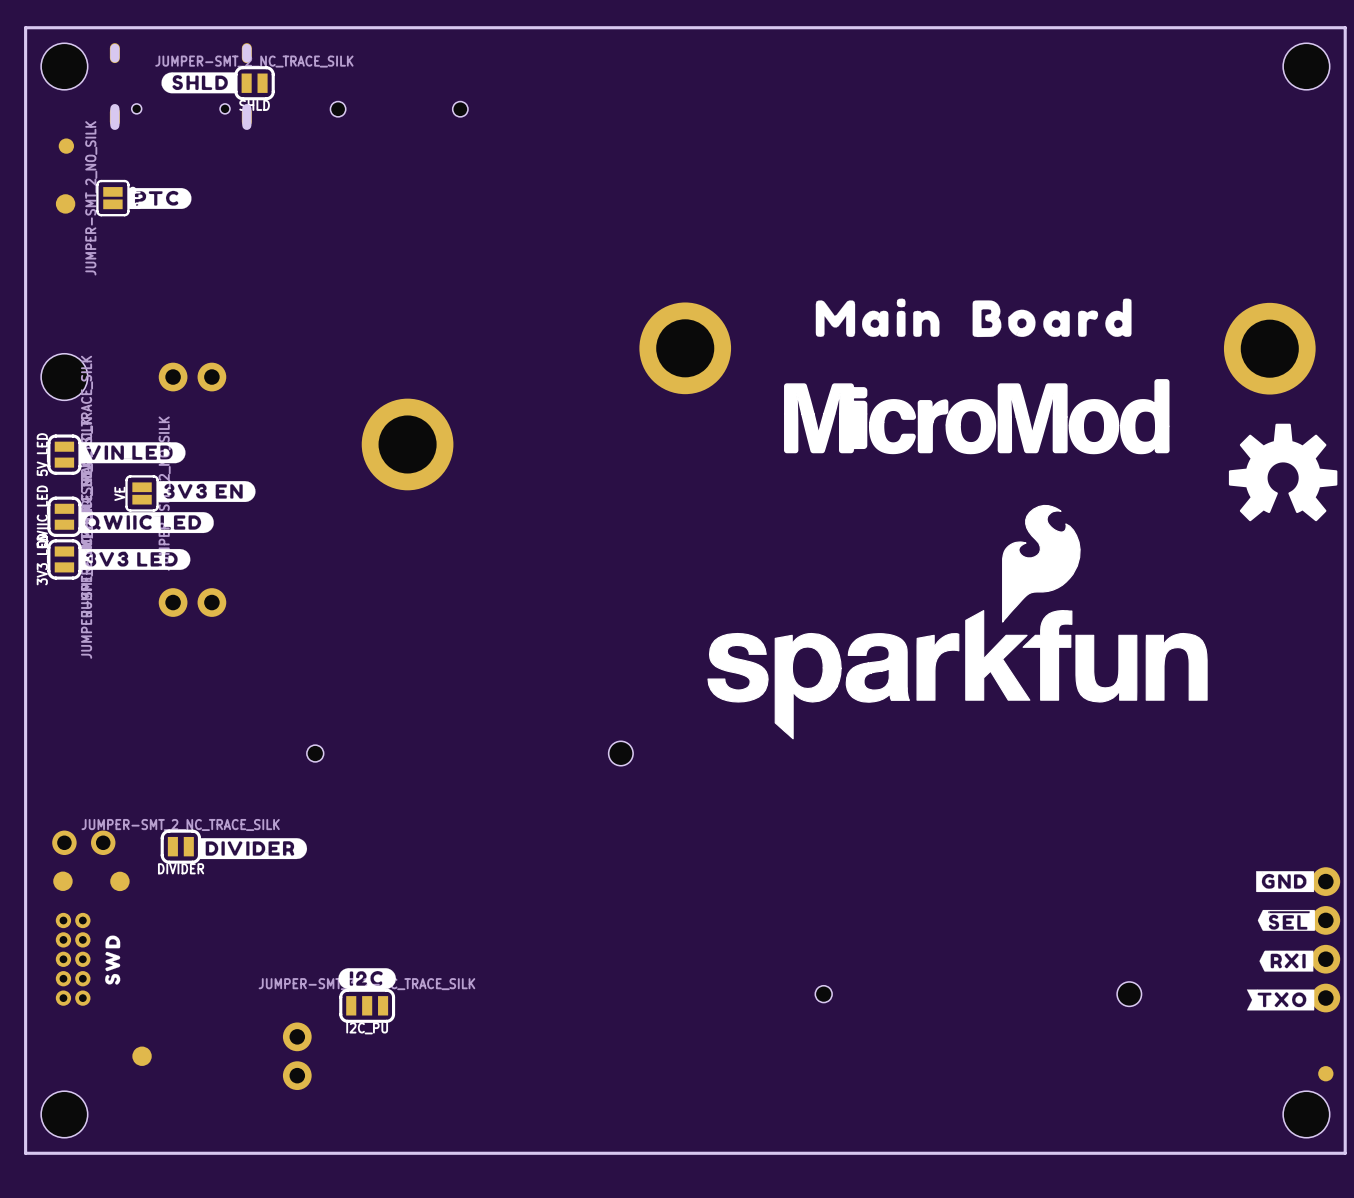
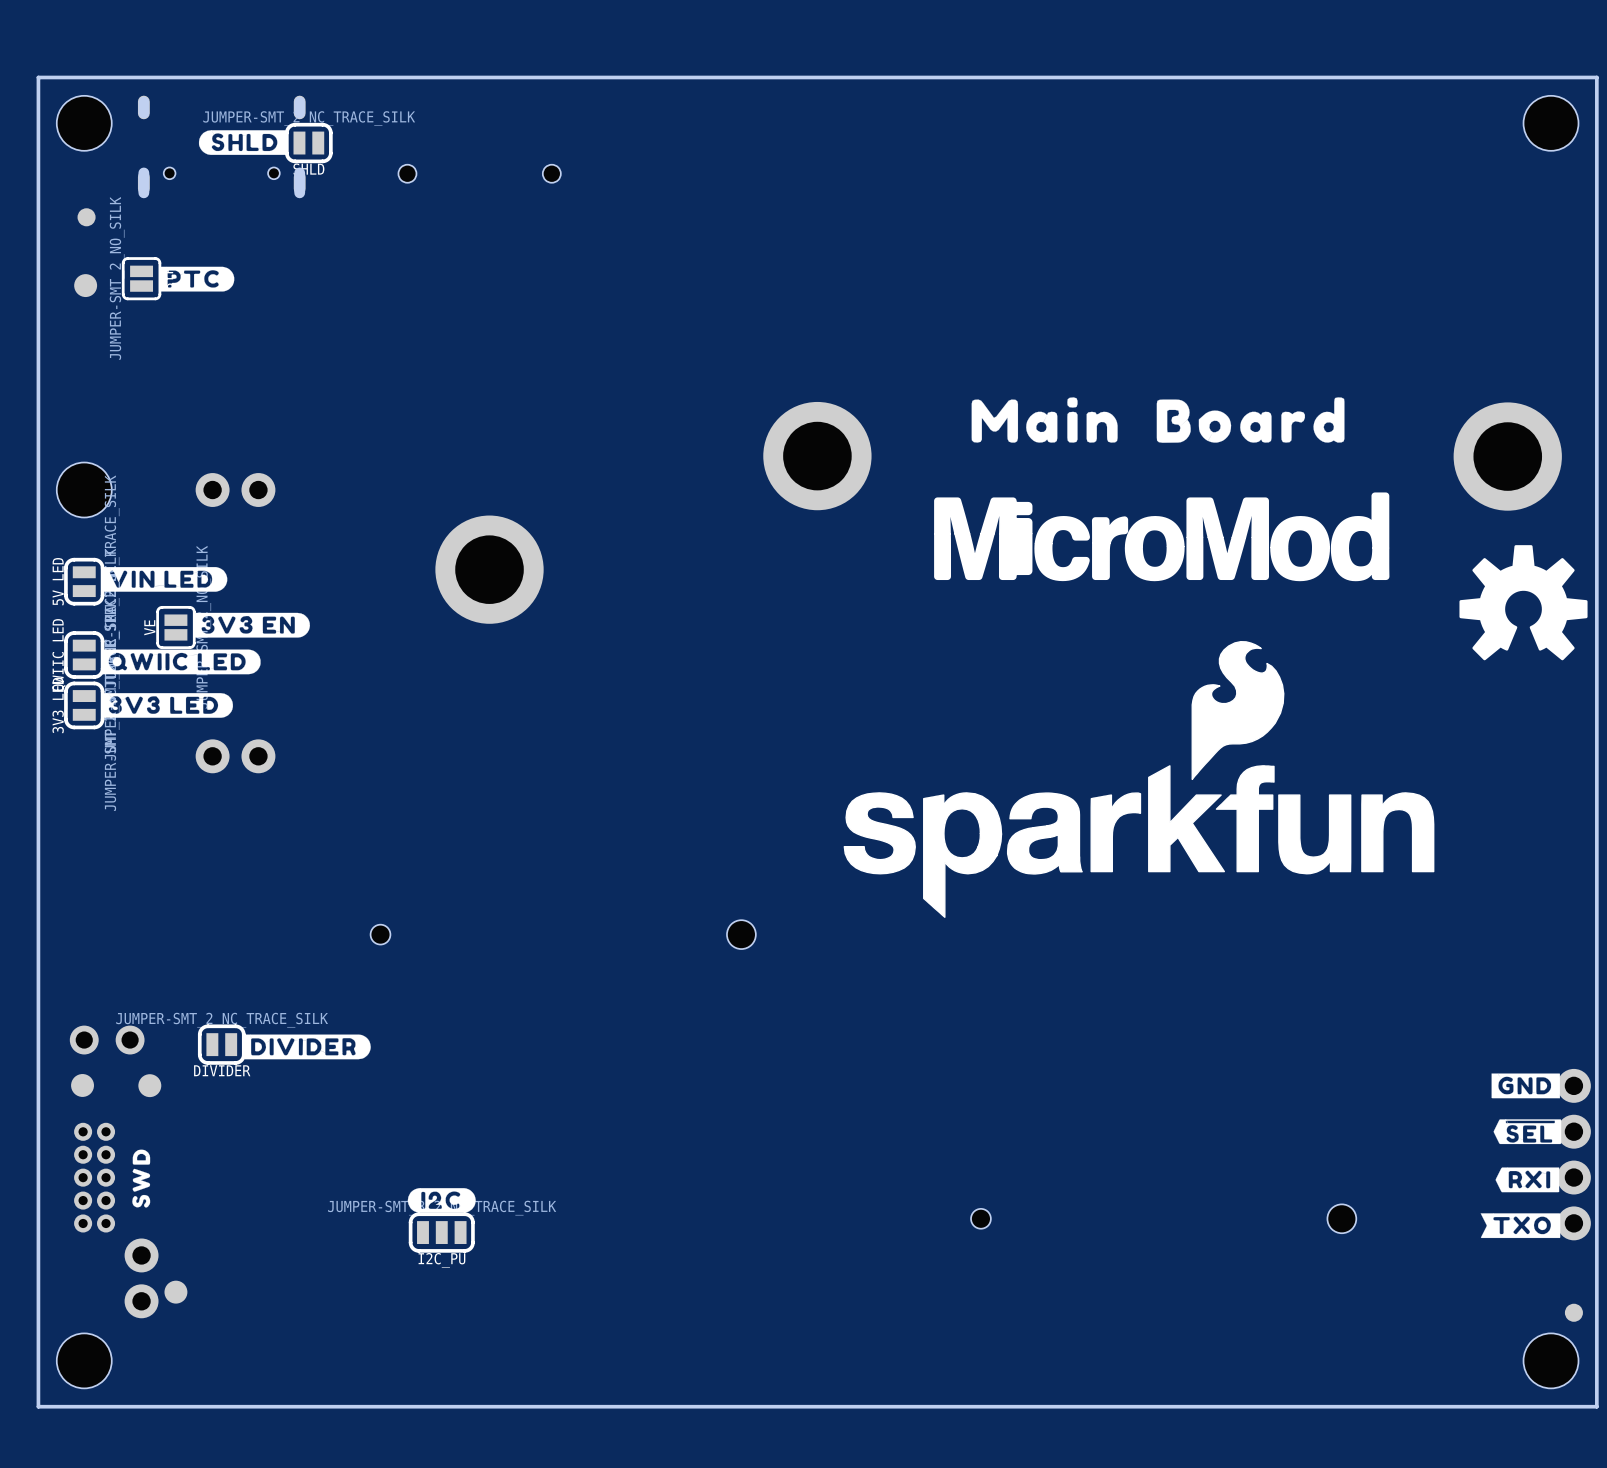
part position: (297, 1056) -> (141, 1278)

